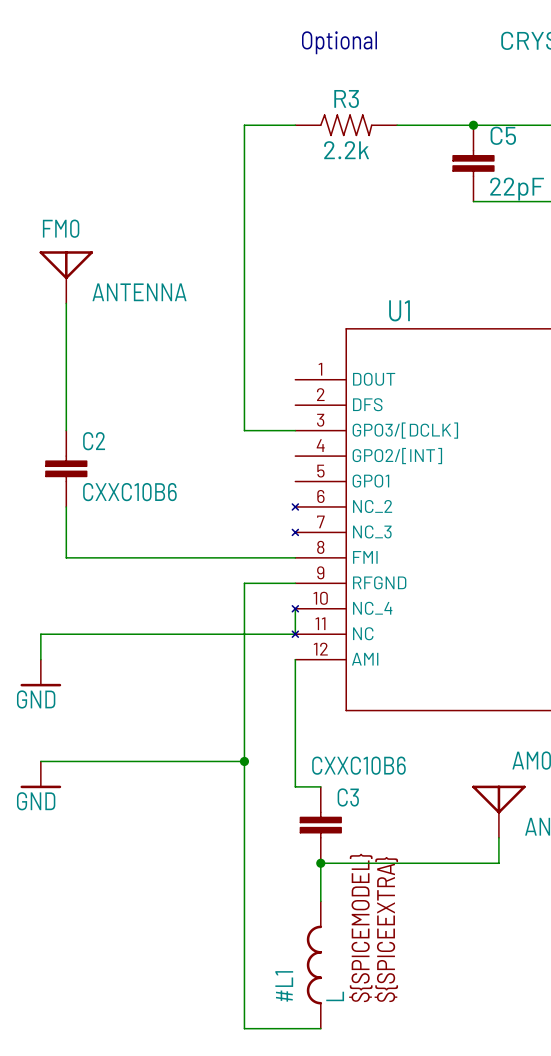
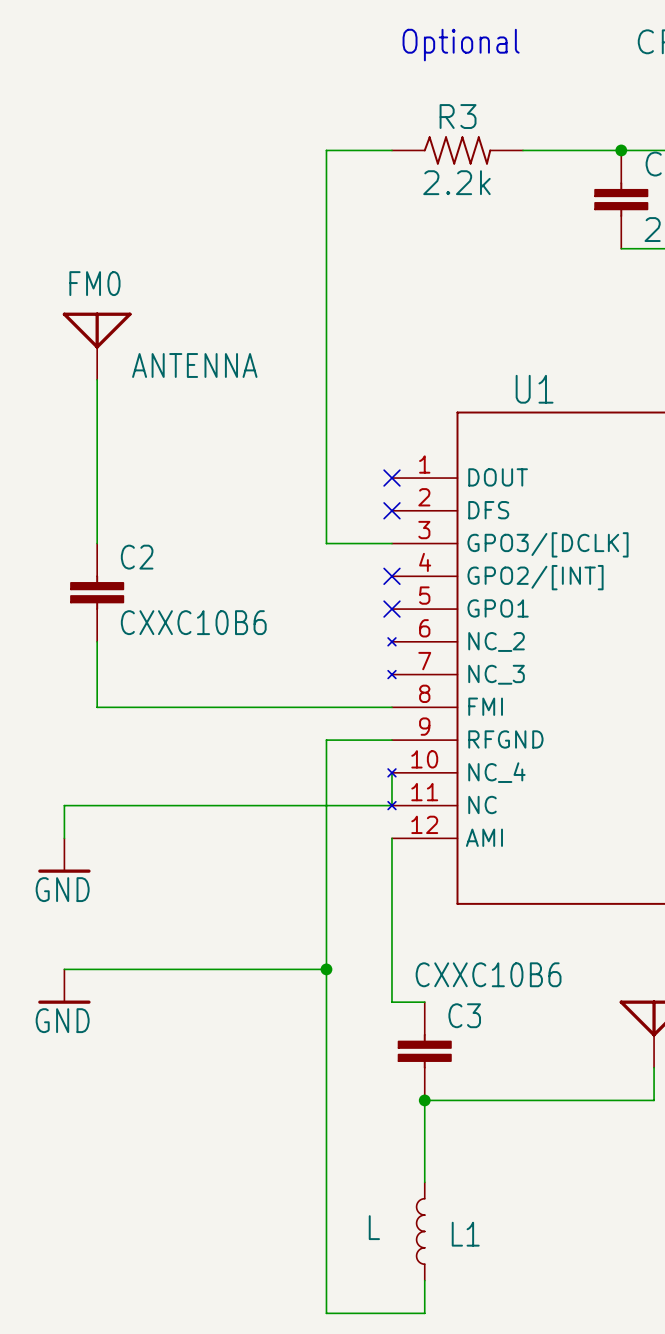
no-connect mark: none -> (391, 478)
no-connect mark: none -> (391, 510)
no-connect mark: none -> (391, 576)
no-connect mark: none -> (391, 609)
#L1: L (314, 965) -> none
L1: none -> L (420, 1231)

